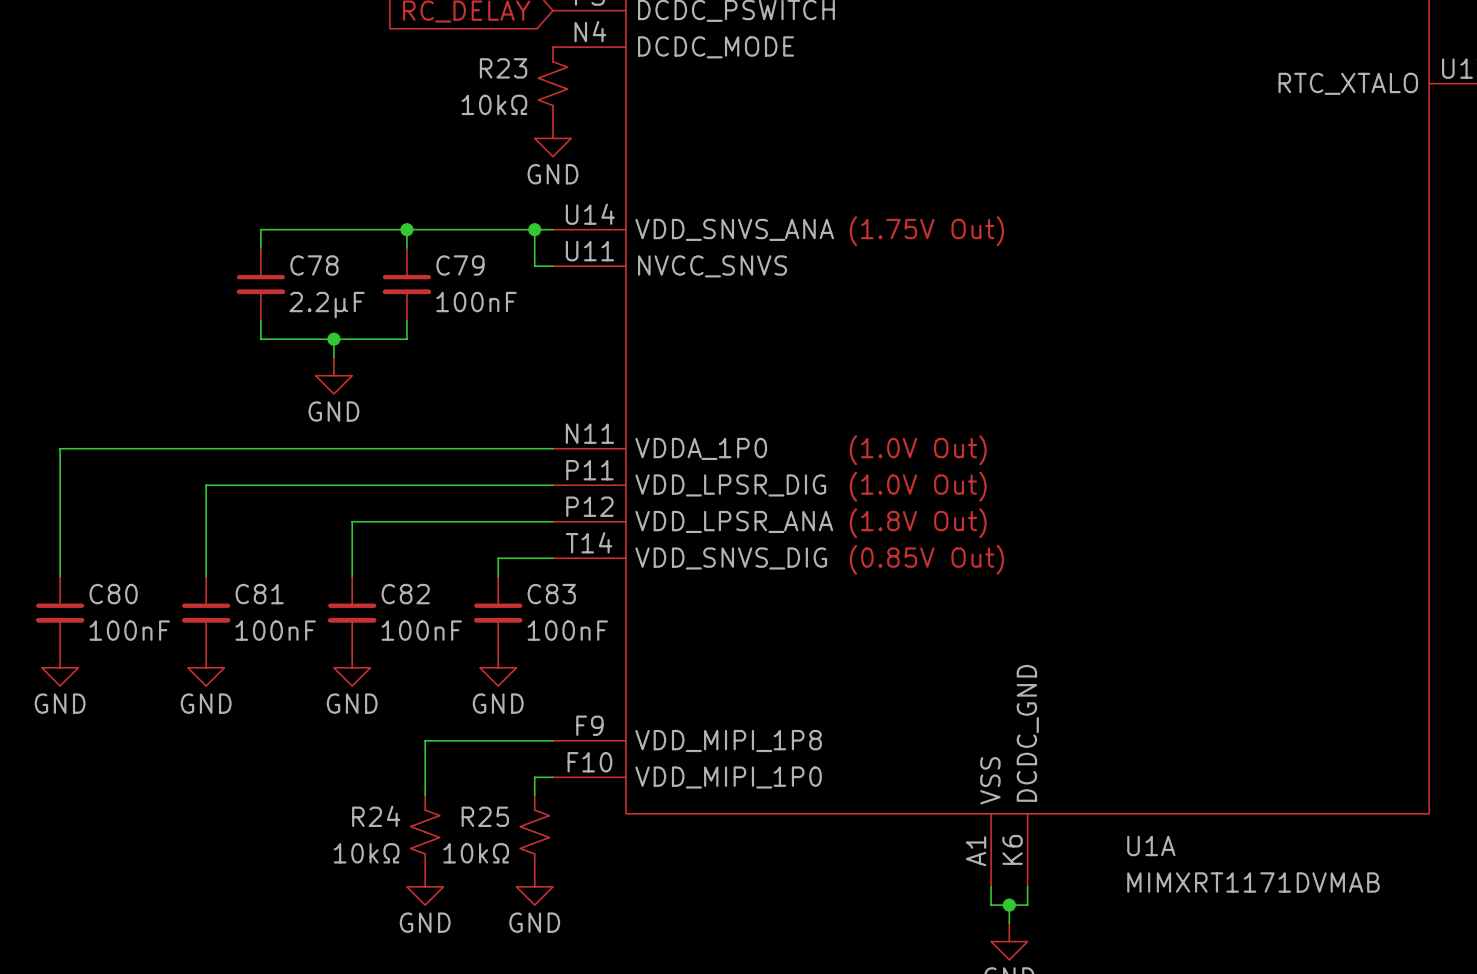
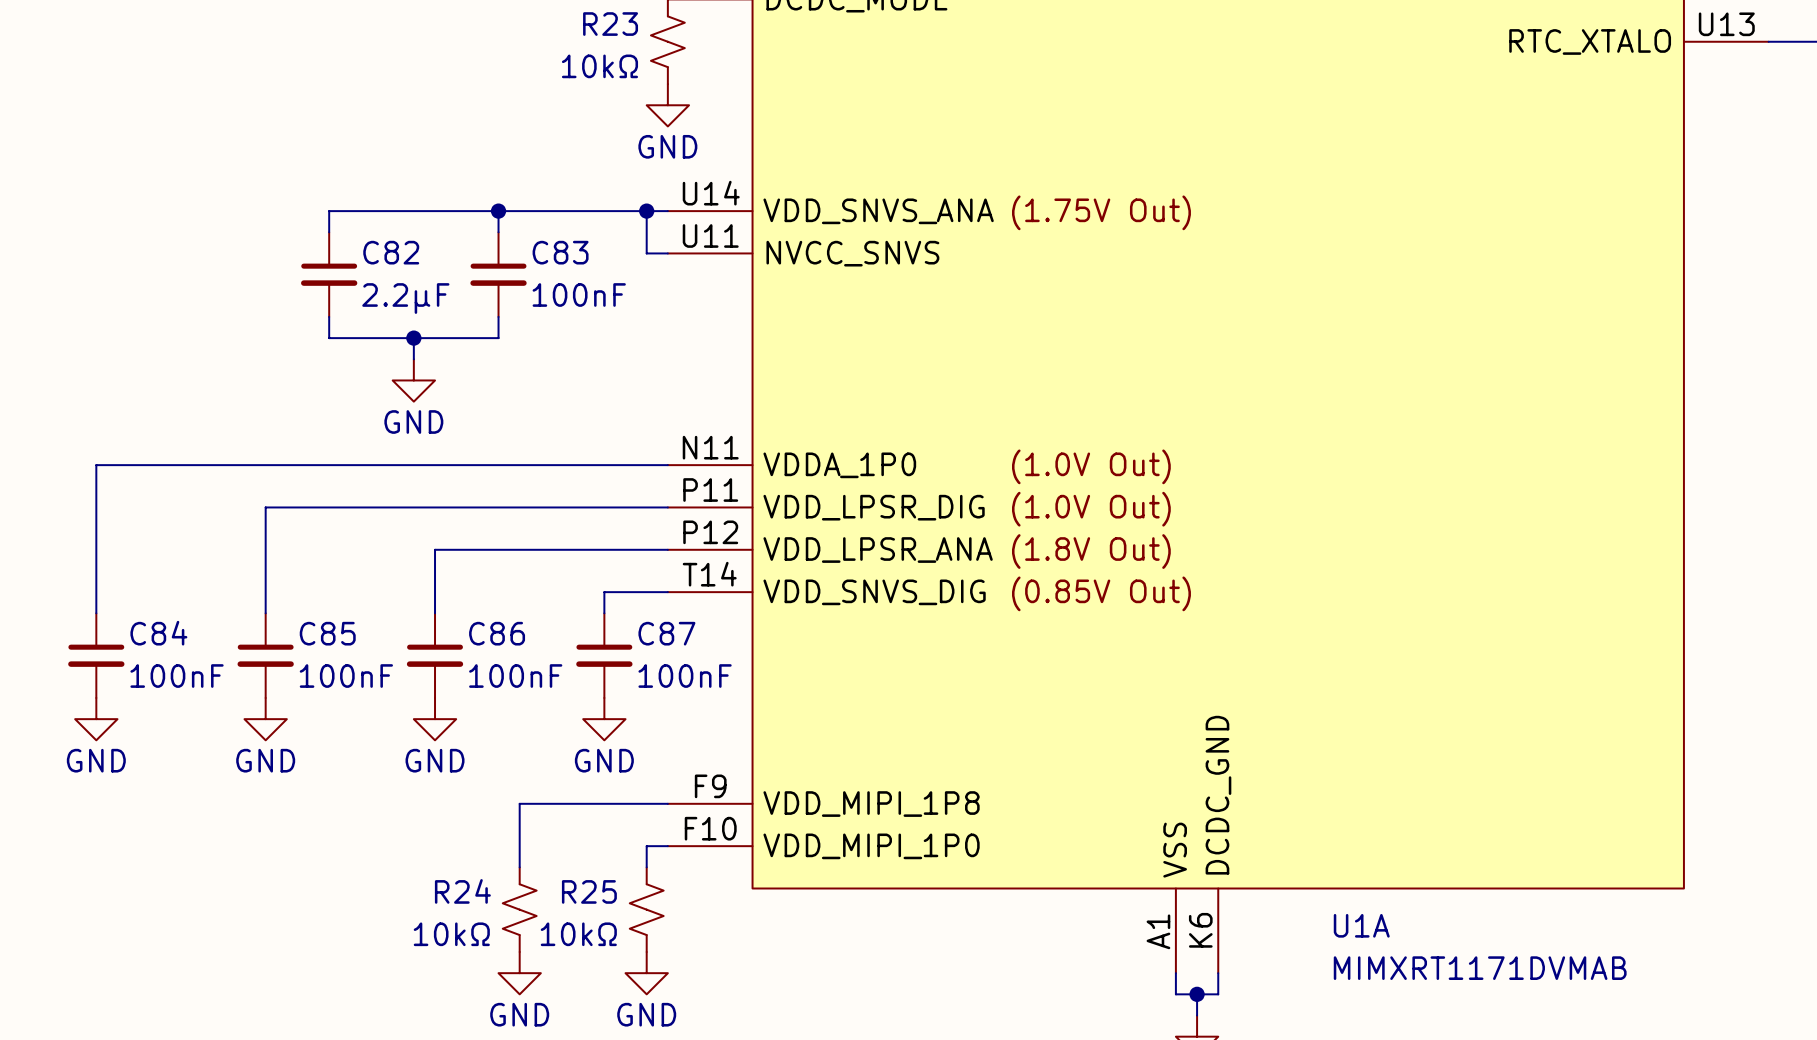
C78 name: C78 (314, 265) -> C82 (391, 252)
C79 name: C79 (460, 265) -> C83 (560, 252)
C80 name: C80 (113, 594) -> C84 (158, 633)
C81 name: C81 (259, 594) -> C85 (327, 633)
C82 name: C82 (405, 594) -> C86 (497, 633)
C83 name: C83 (551, 594) -> C87 (666, 633)

